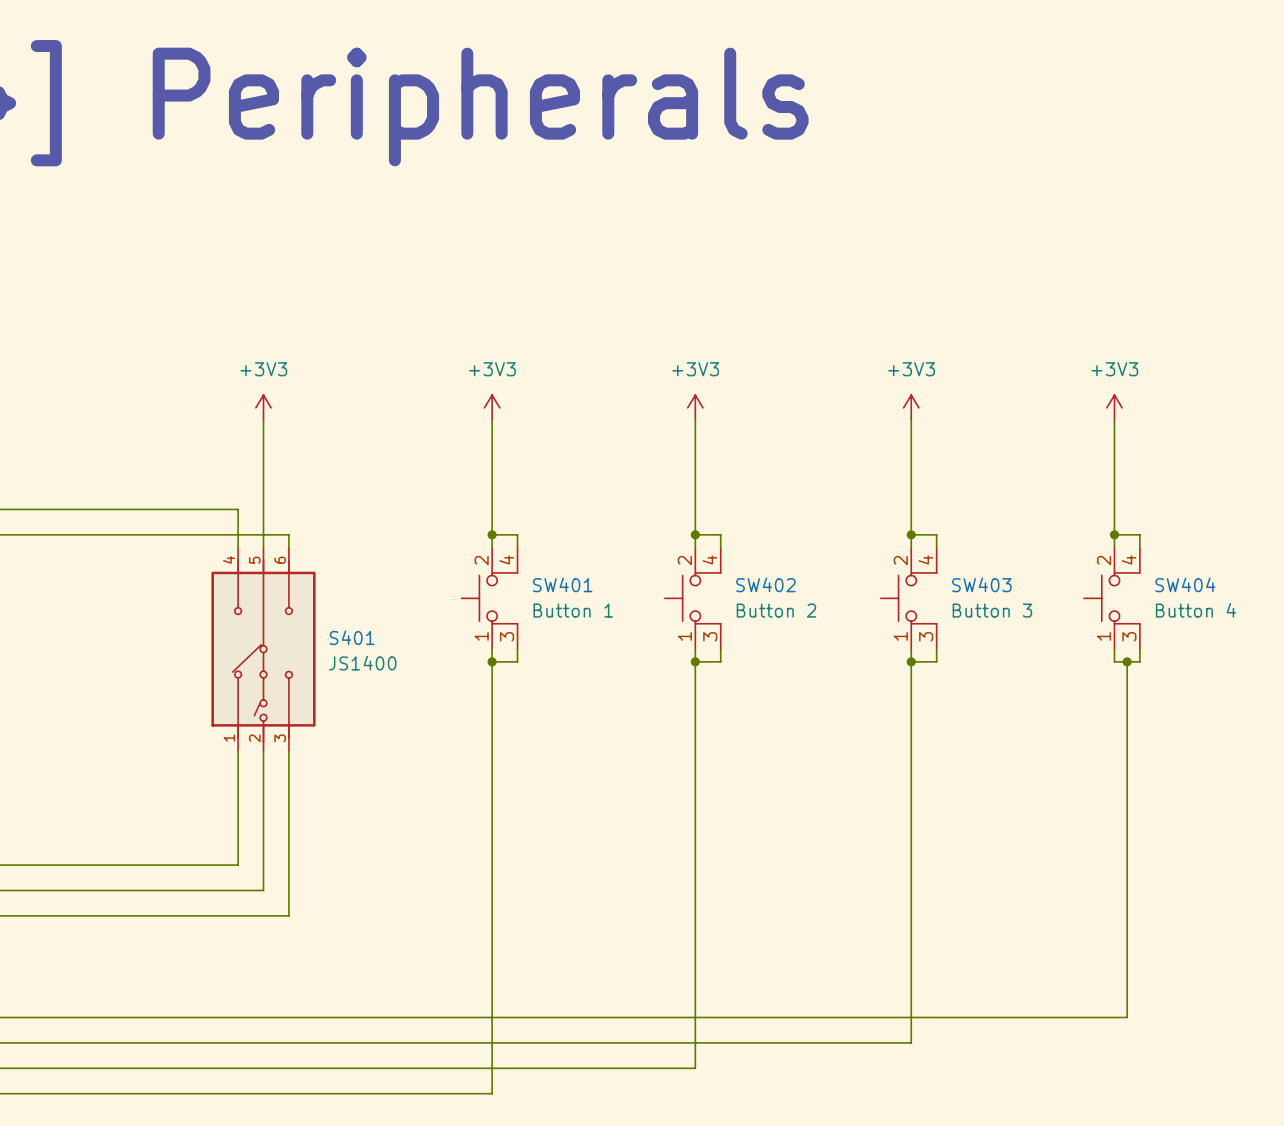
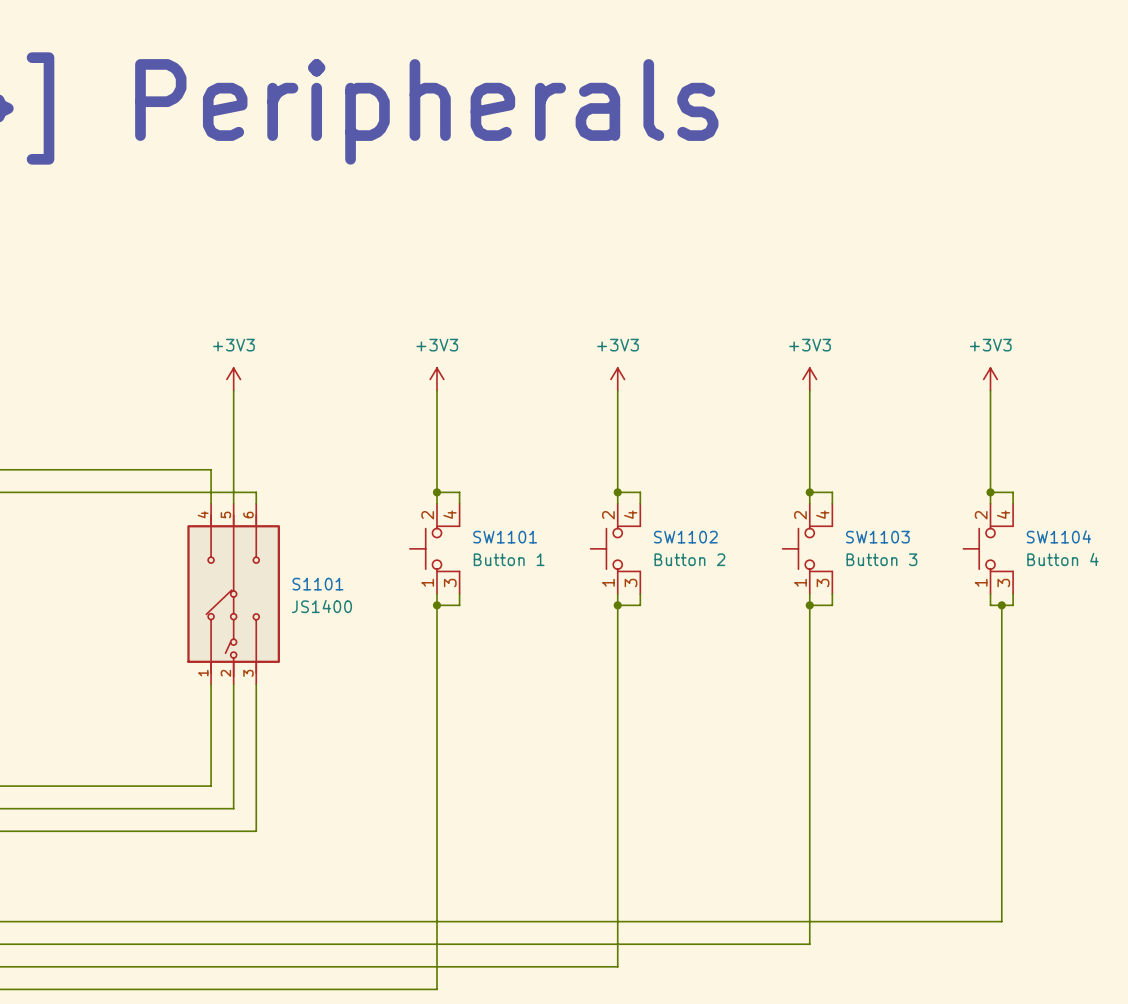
SW401 name: SW401 (562, 584) -> SW1101 (505, 537)
SW402 name: SW402 (765, 584) -> SW1102 (685, 537)
SW403 name: SW403 (981, 584) -> SW1103 (877, 537)
SW404 name: SW404 (1185, 584) -> SW1104 (1058, 536)
S401 name: S401 (352, 637) -> S1101 (317, 584)

